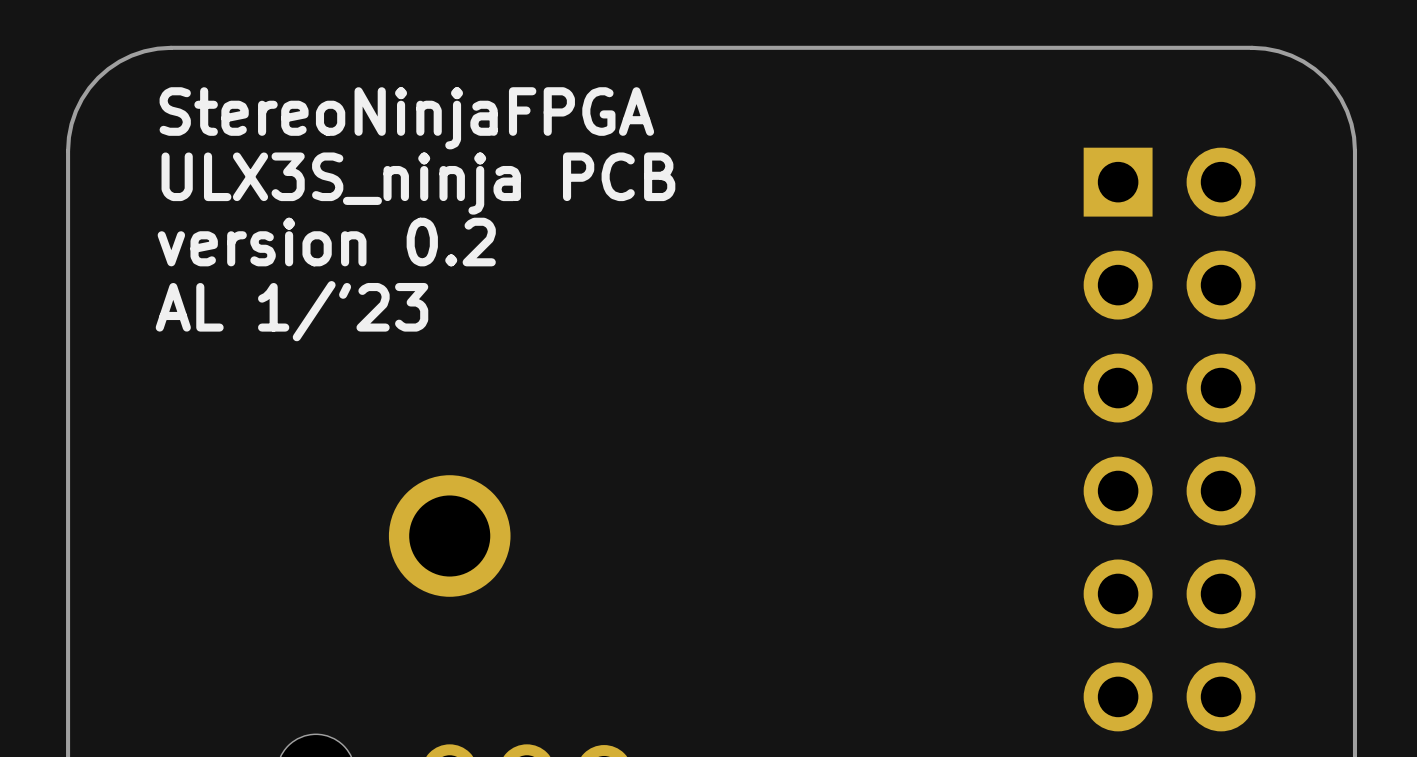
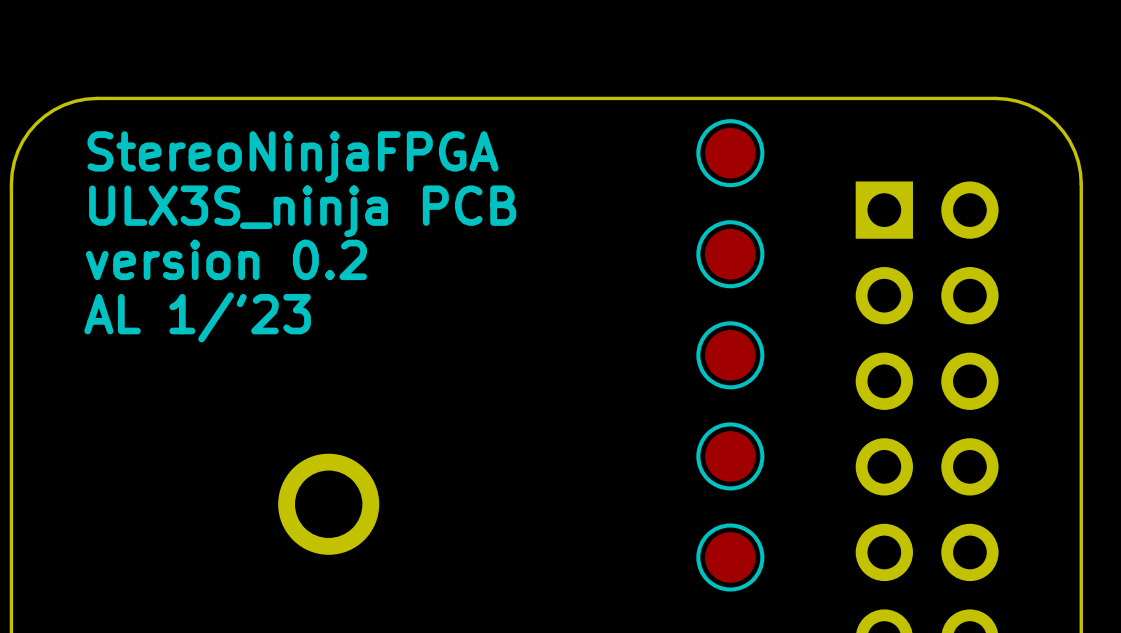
part: none -> (730, 153)
part: none -> (730, 254)
part: none -> (730, 355)
part: none -> (730, 456)
part: none -> (730, 557)

